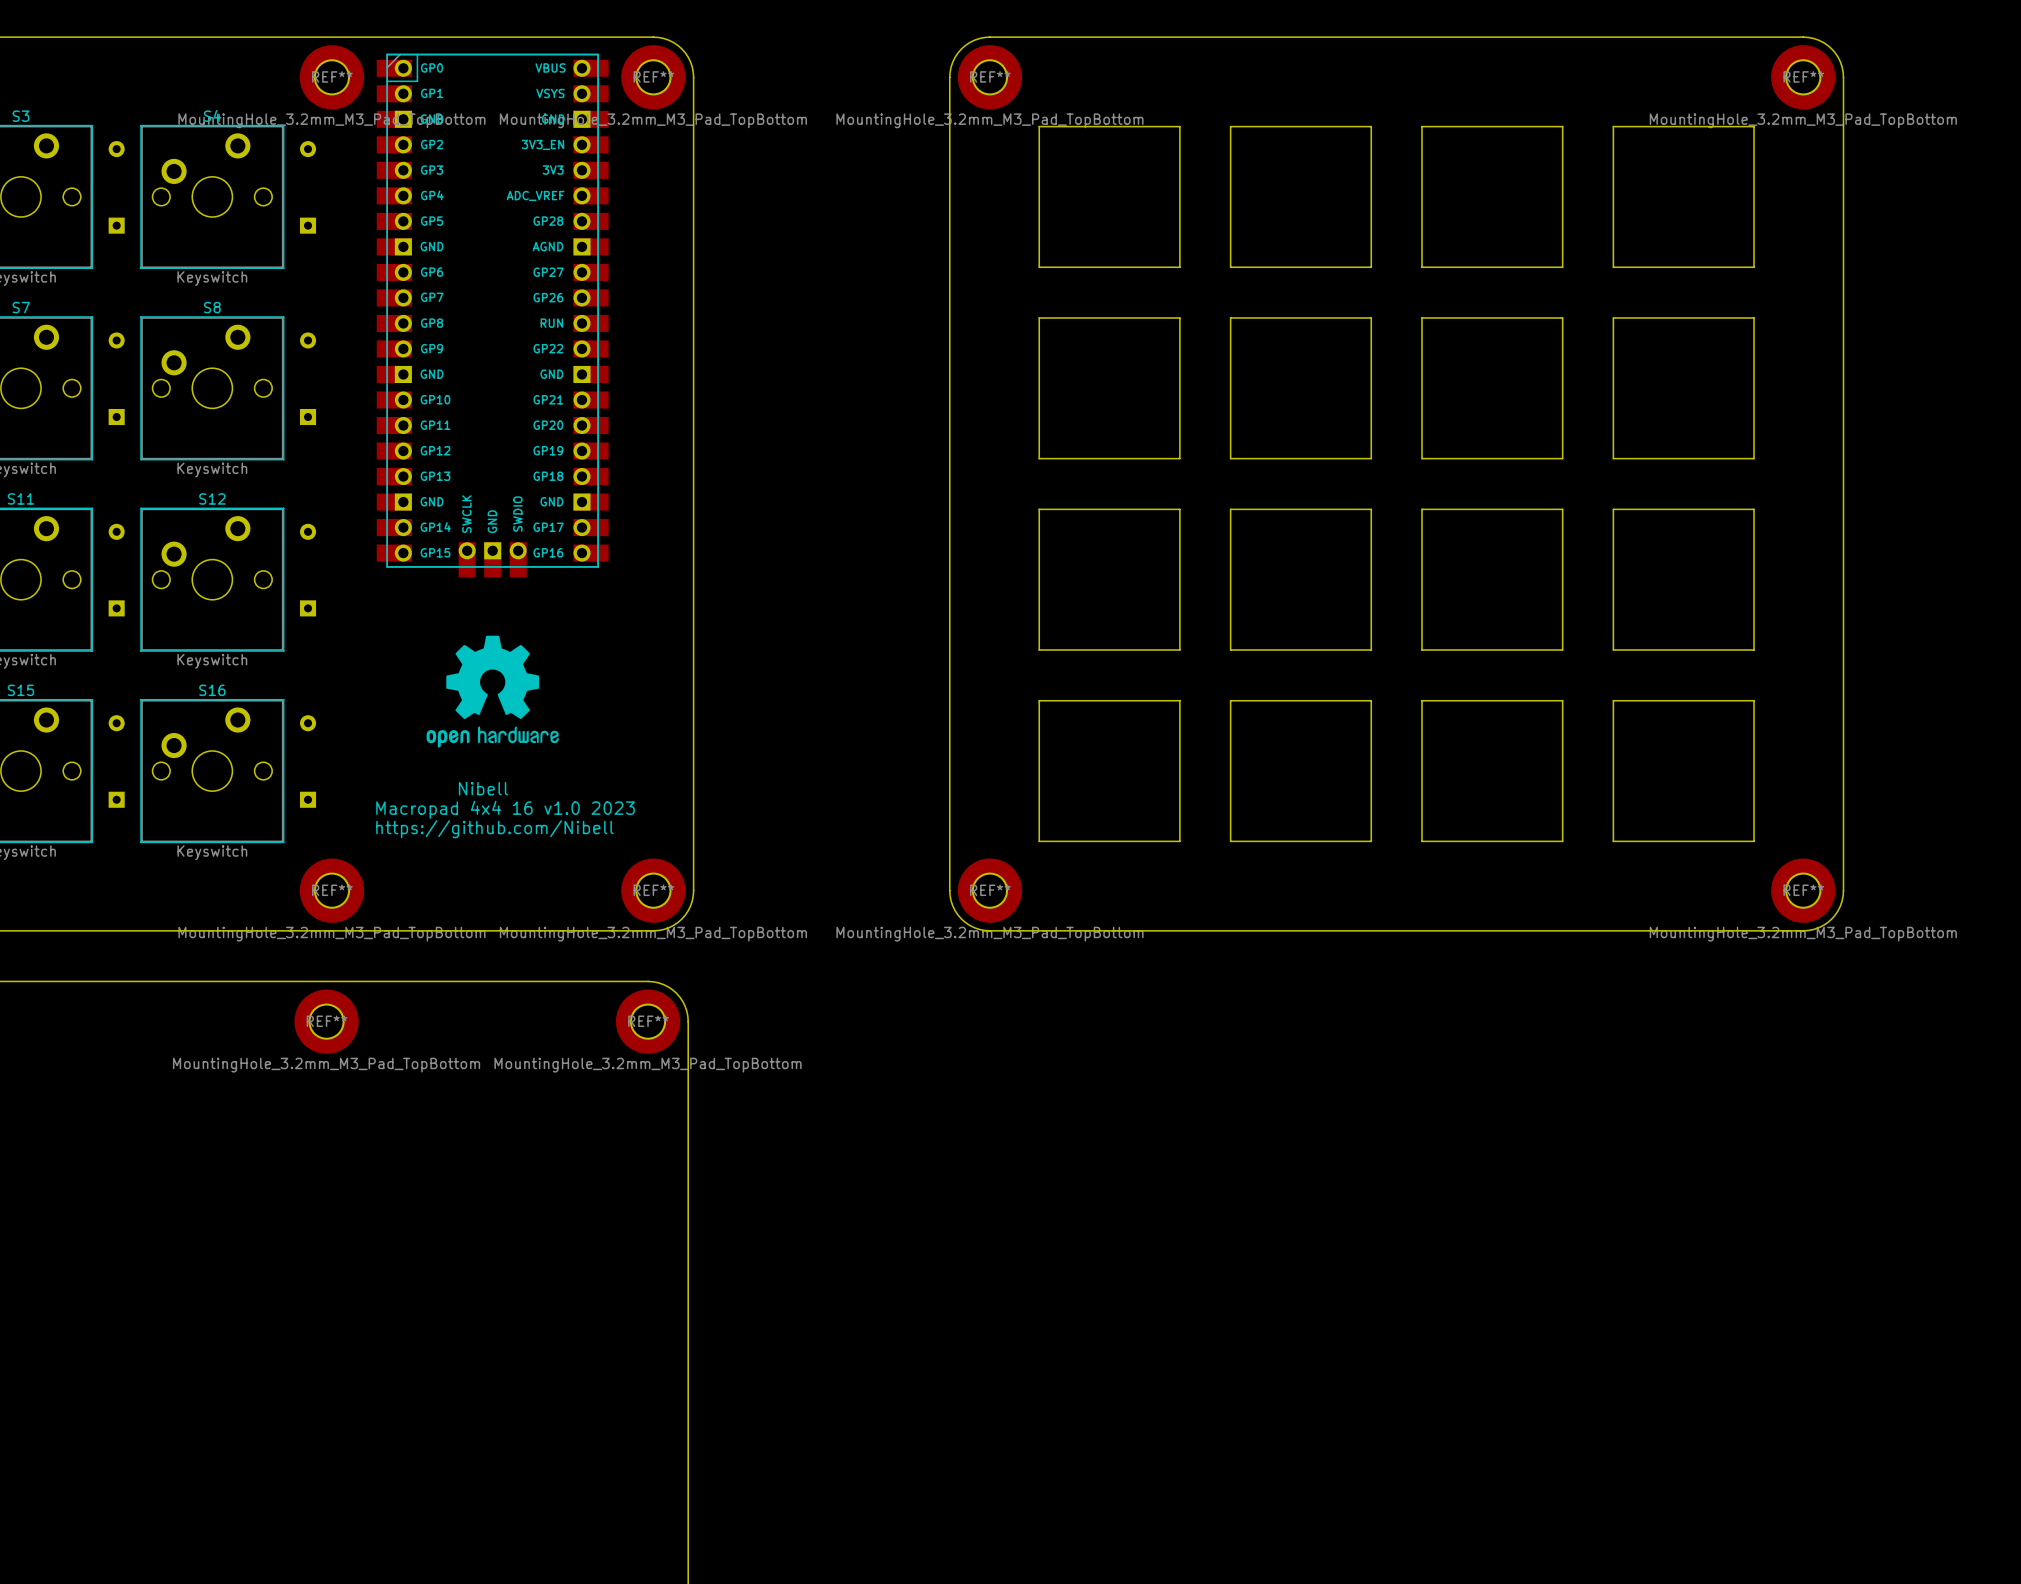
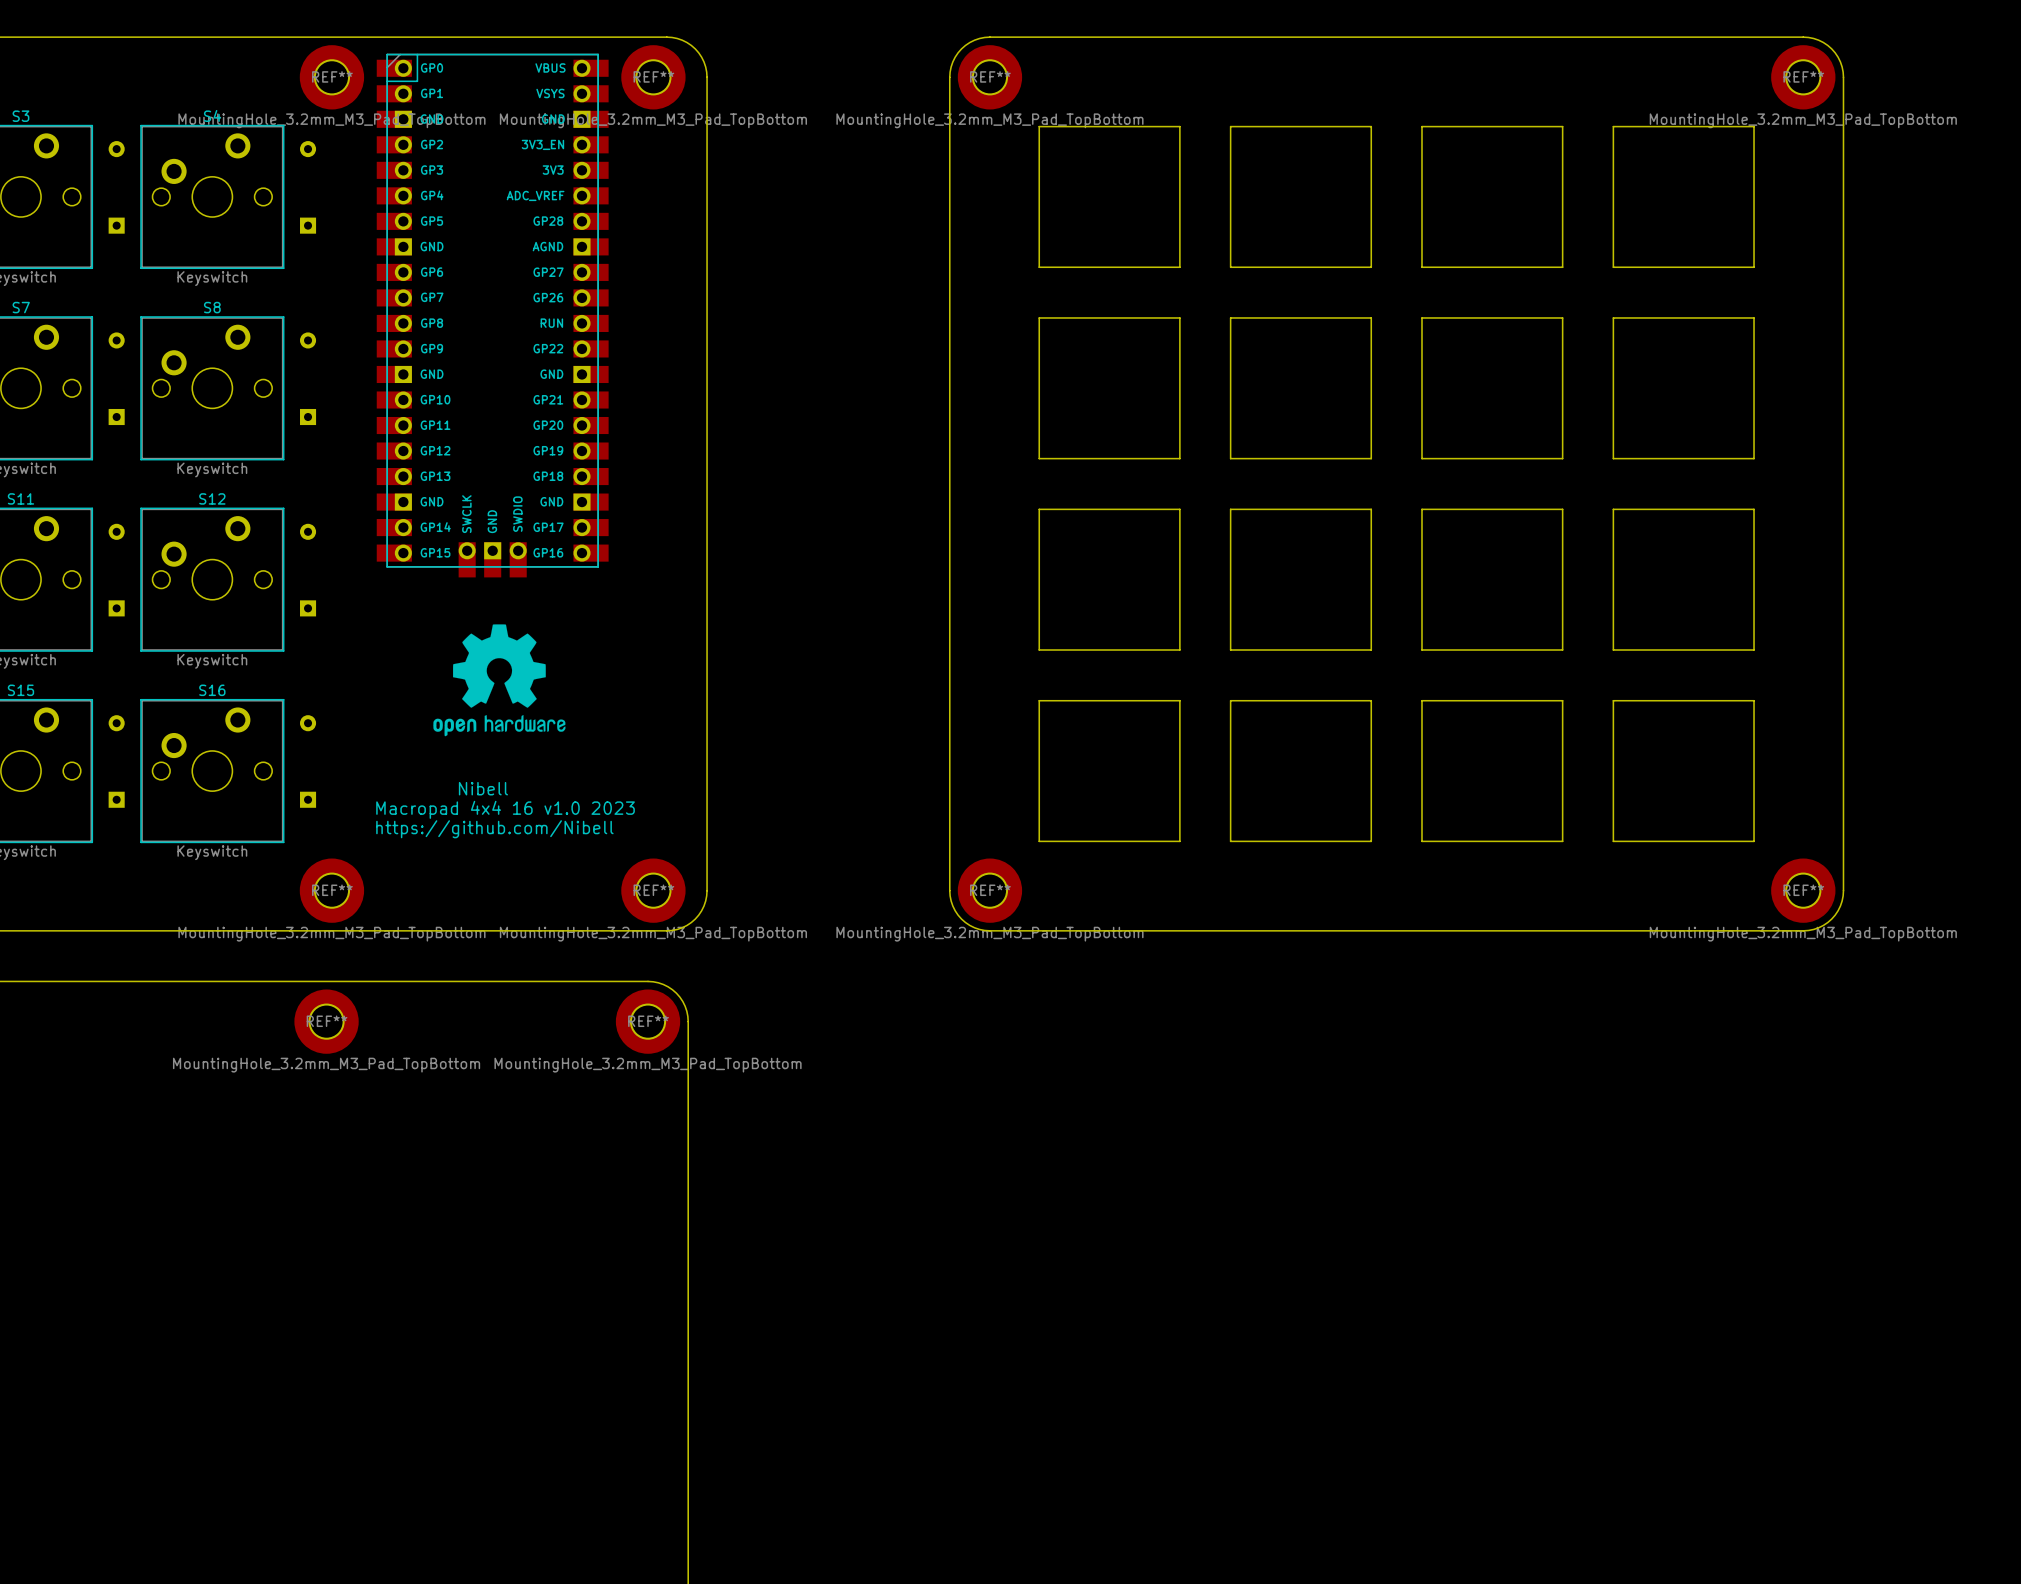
board edge: (653, 37) (668, 40) (681, 48) (690, 61) (693, 77) (693, 890) (690, 906) (681, 919) (668, 927) (653, 930) -> (653, 37) (677, 38) (691, 45) (703, 61) (707, 77) (707, 890) (703, 906) (691, 922) (677, 929) (653, 930)
drawing position: (492, 691) -> (499, 680)

